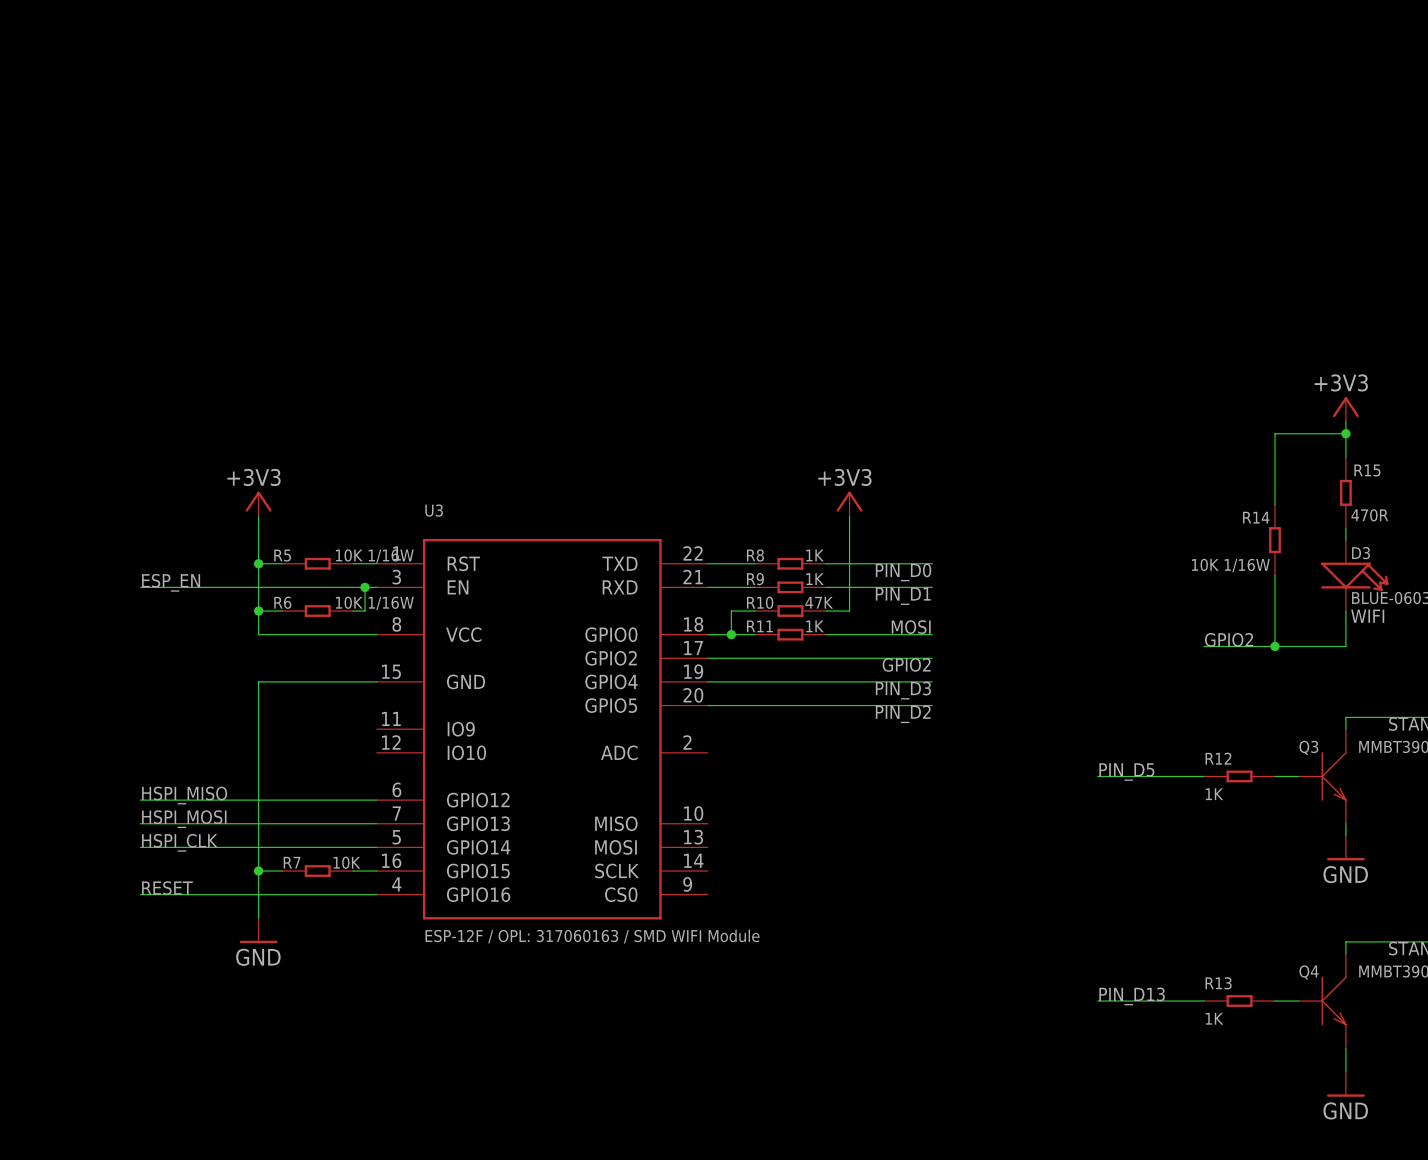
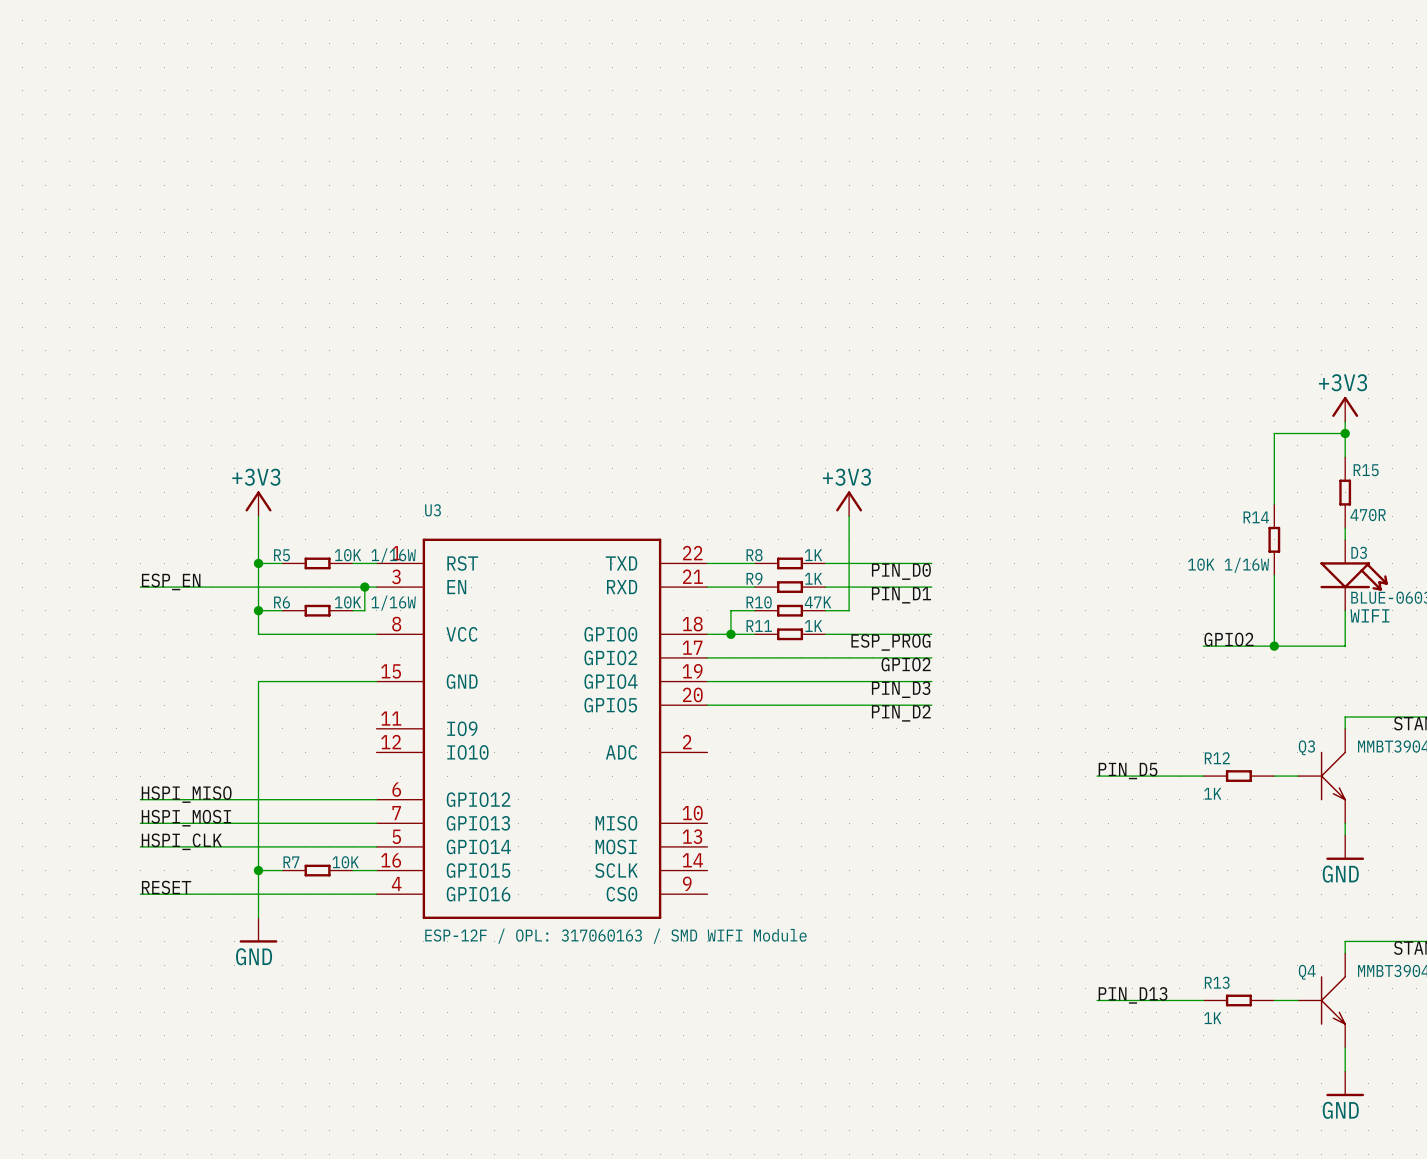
label: MOSI (911, 627) -> none
label: none -> ESP_PROG (890, 642)

